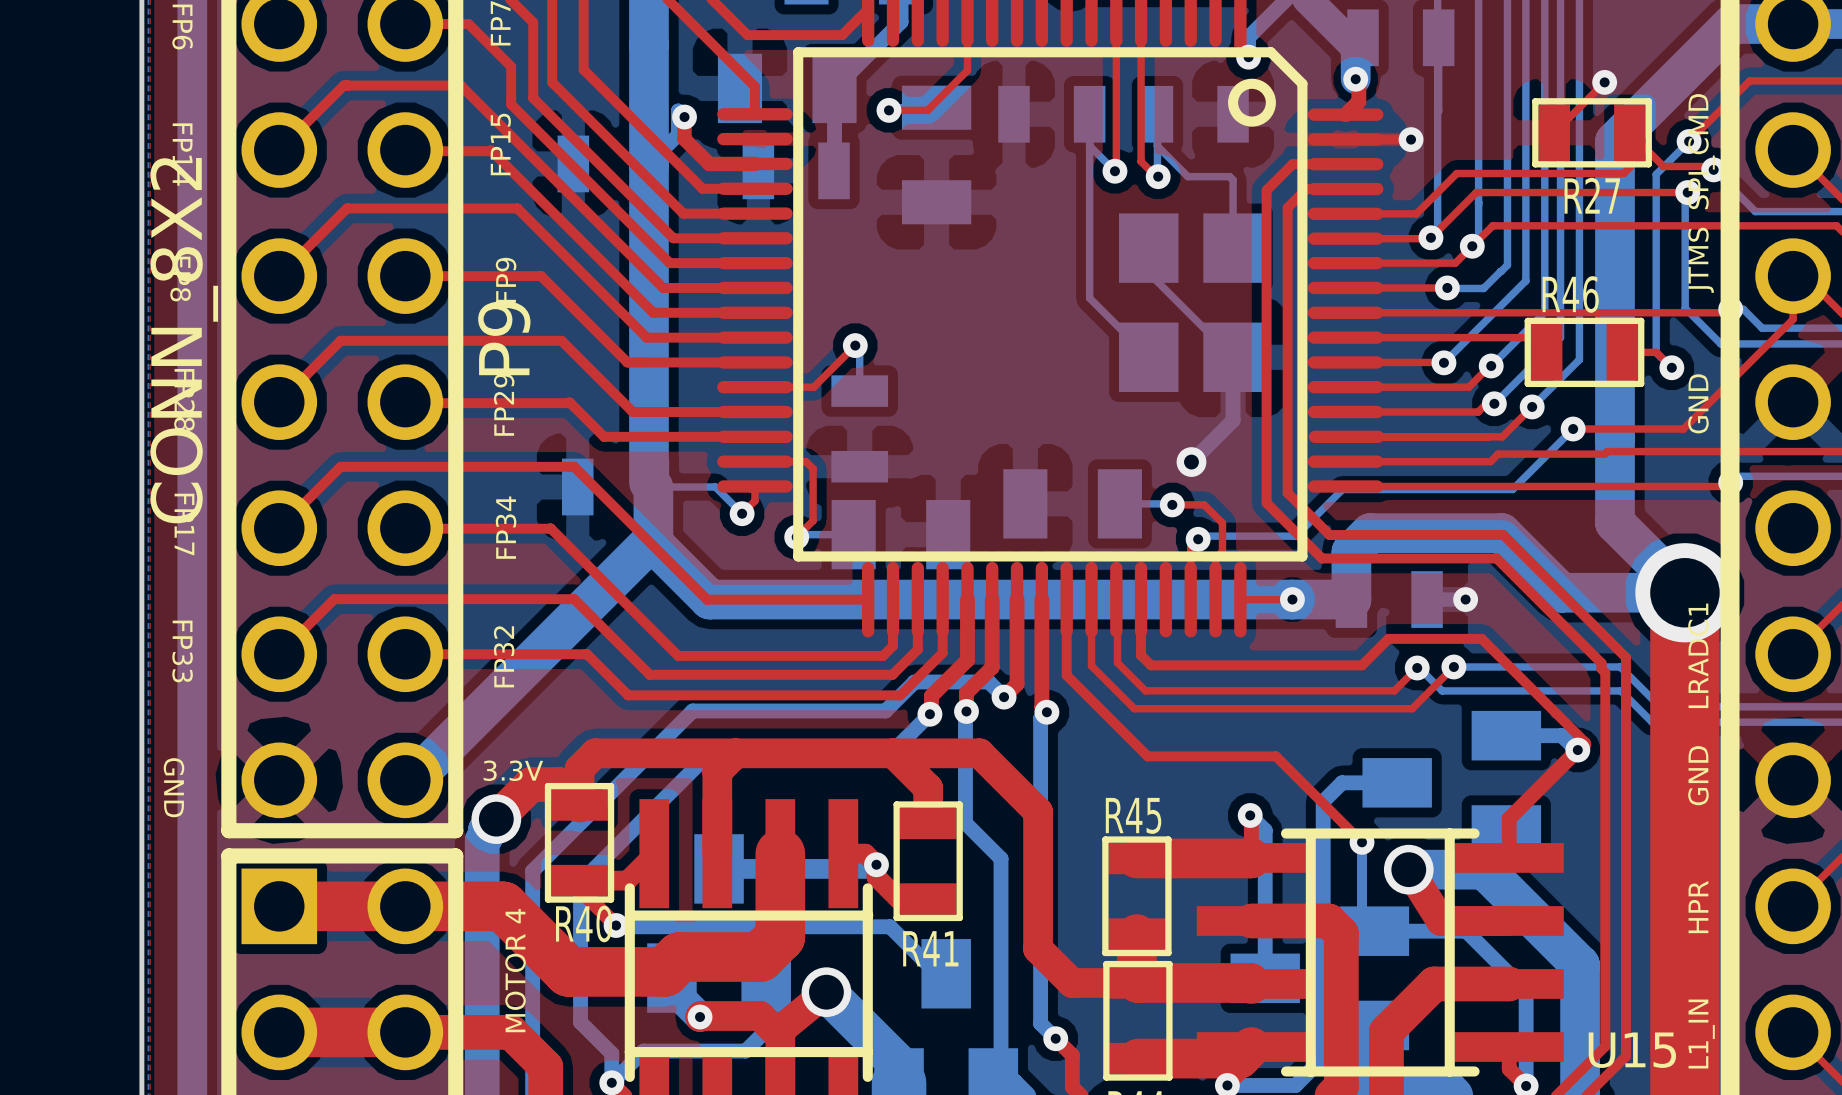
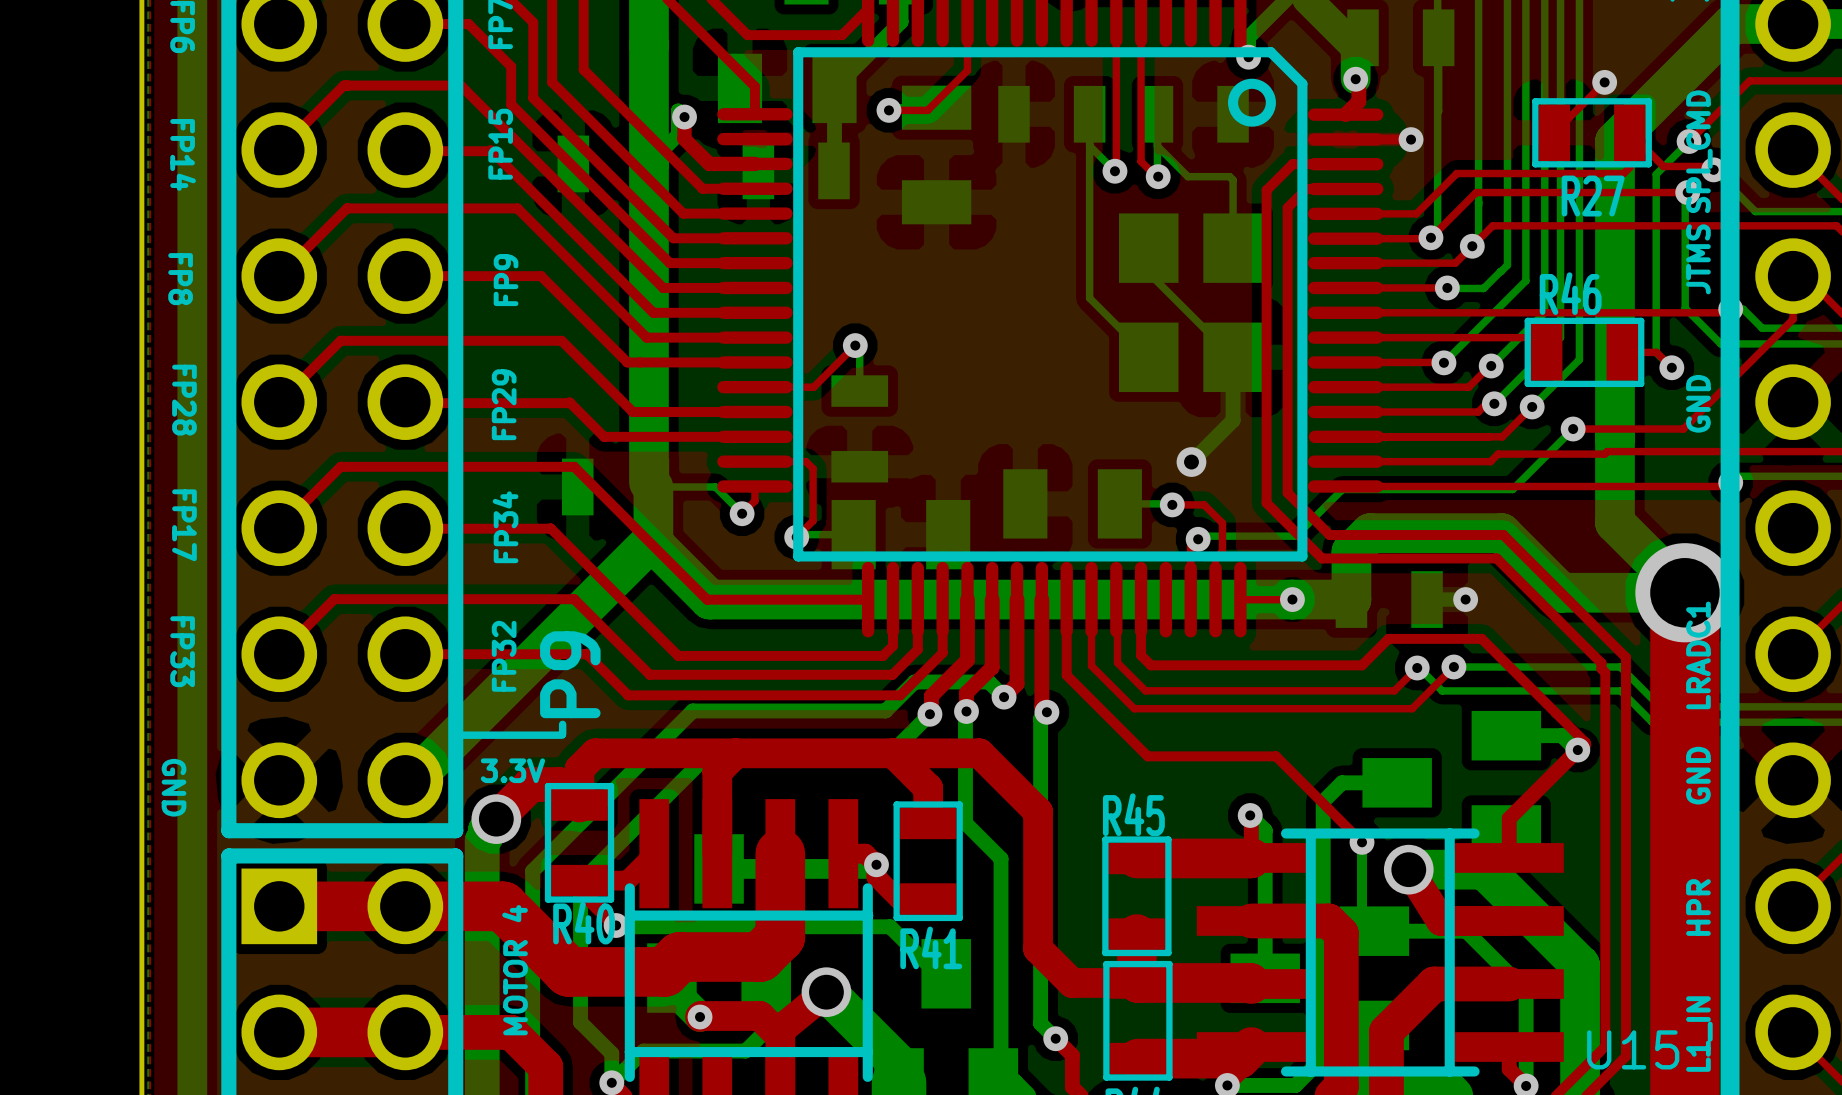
P9 name position: P9 (504, 338) -> P9 (570, 674)
P9 value: CONN_8X2 (184, 340) -> none
line: none -> (562, 724) (562, 734)
line: none -> (459, 735) (562, 735)

